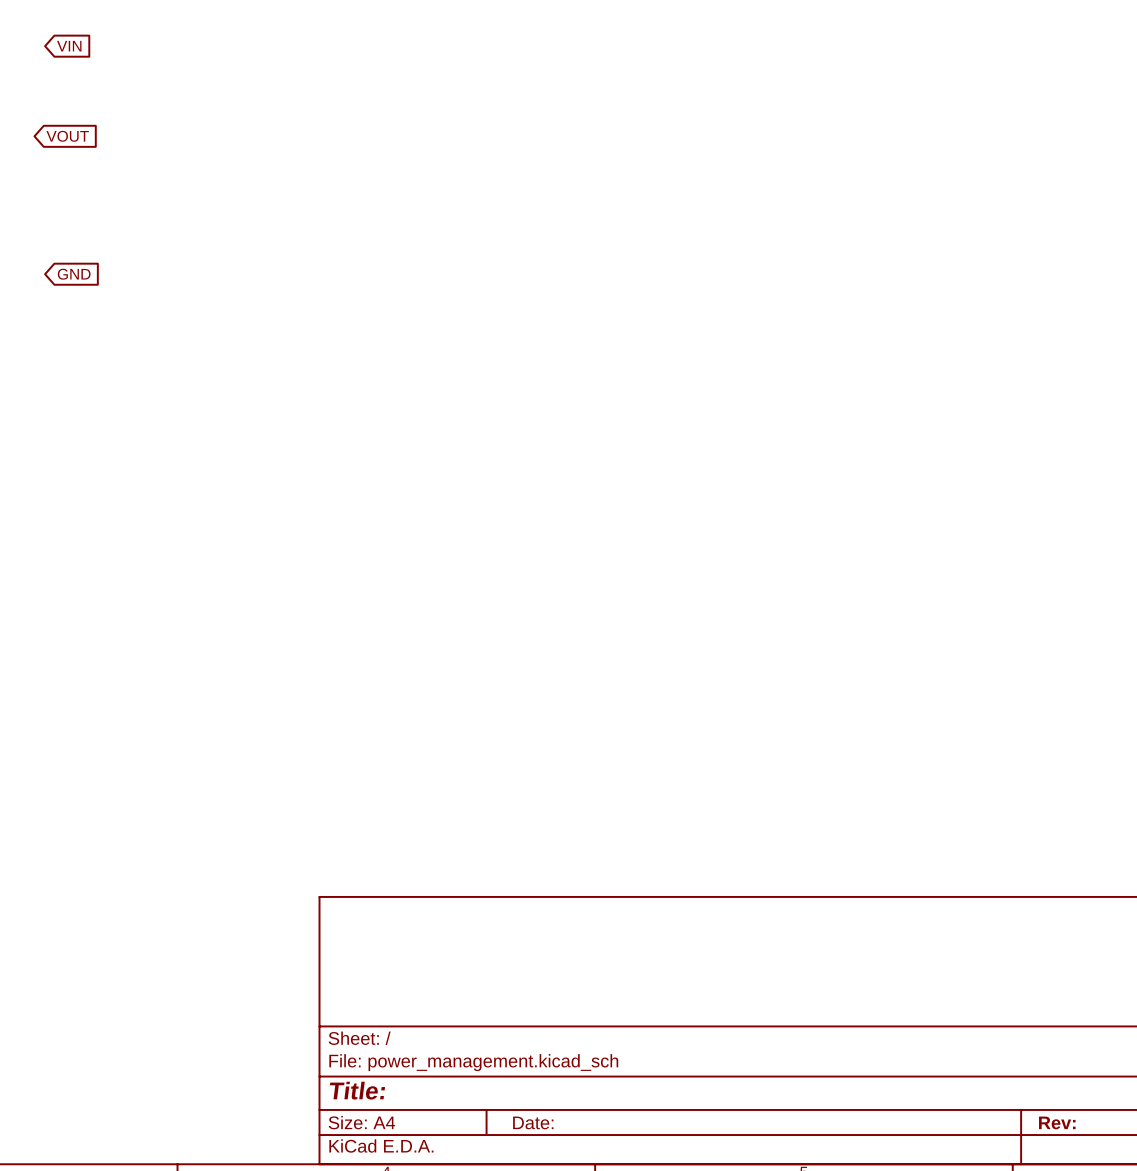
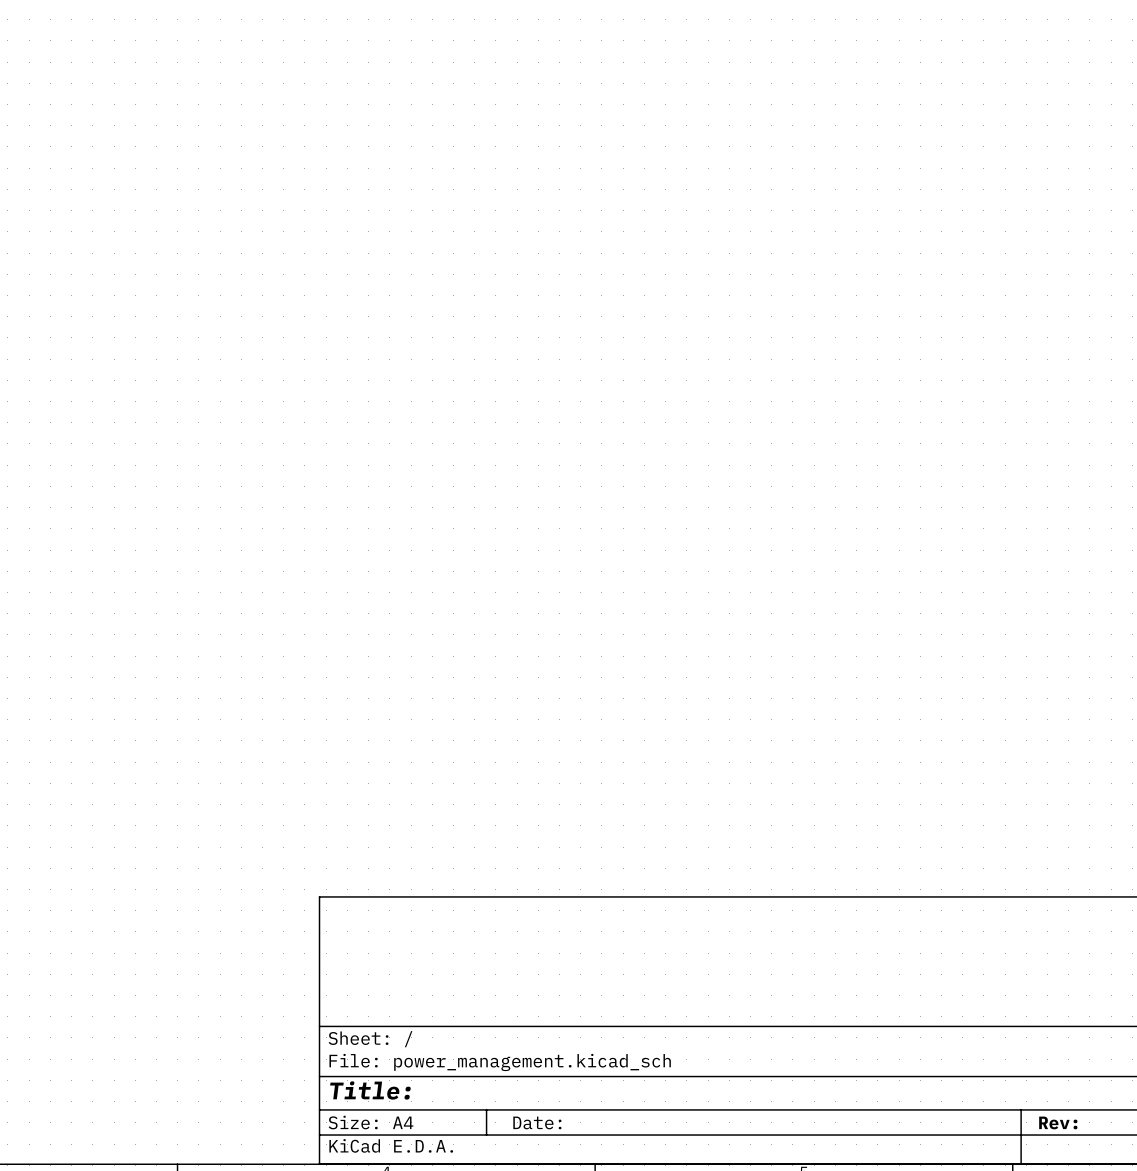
global label: VIN (69, 46) -> none
global label: VOUT (67, 136) -> none
global label: GND (74, 274) -> none

